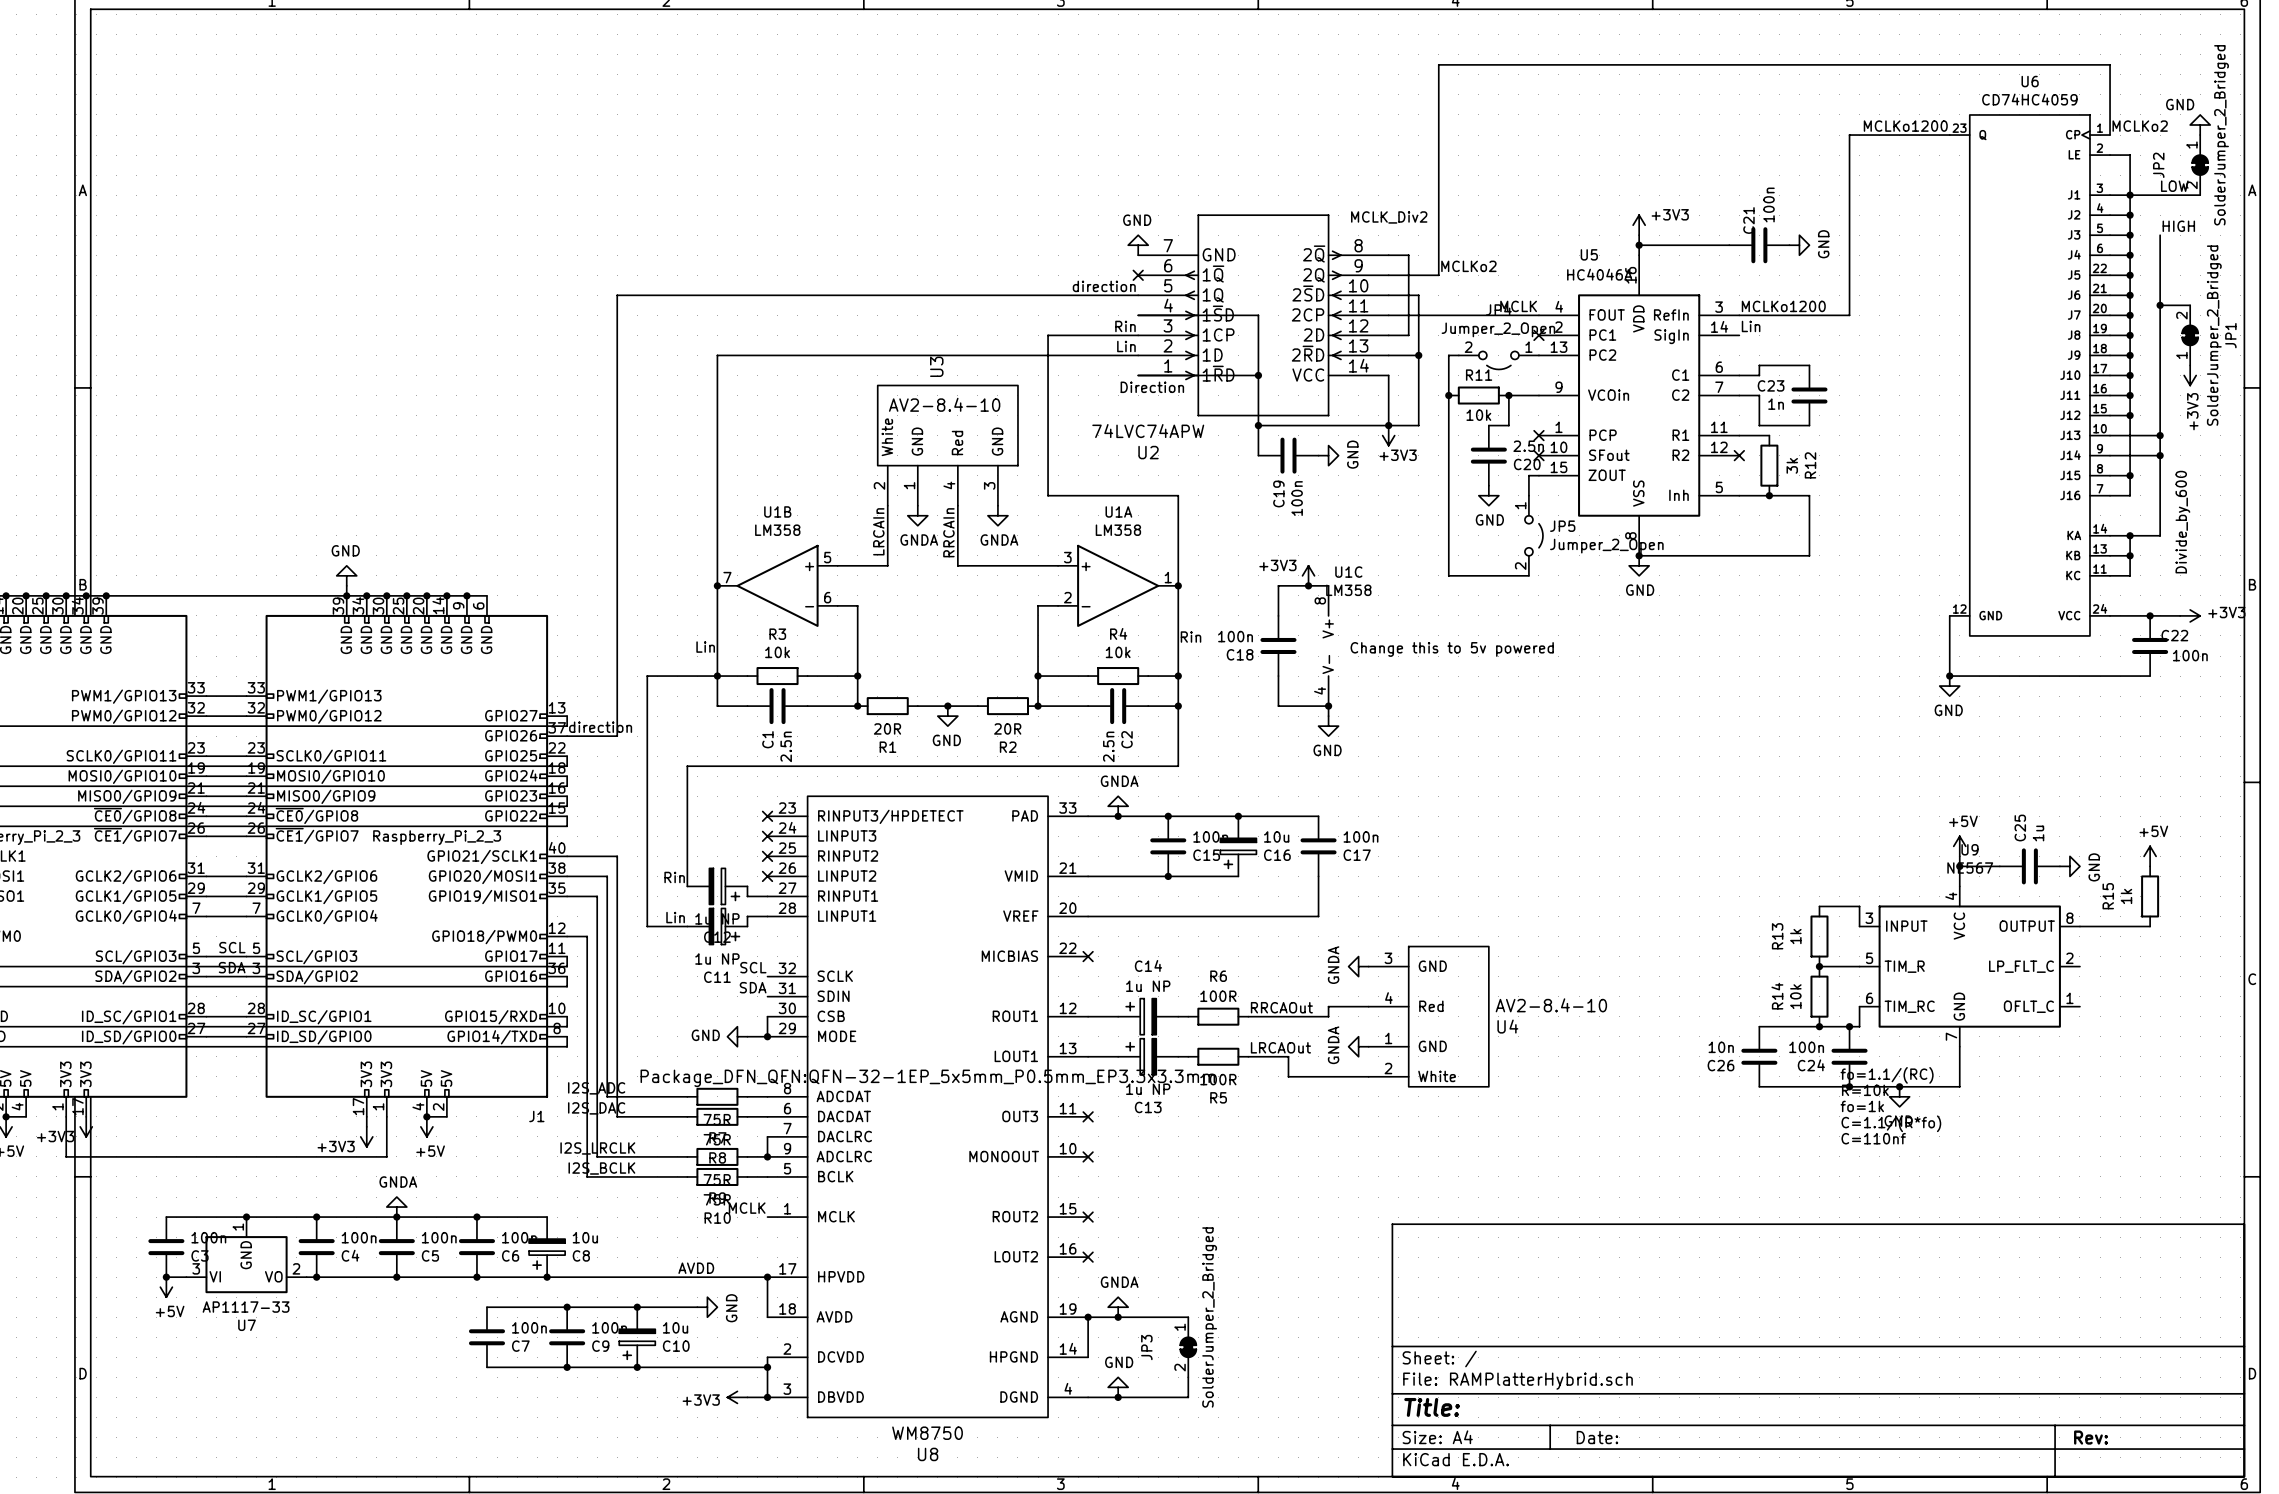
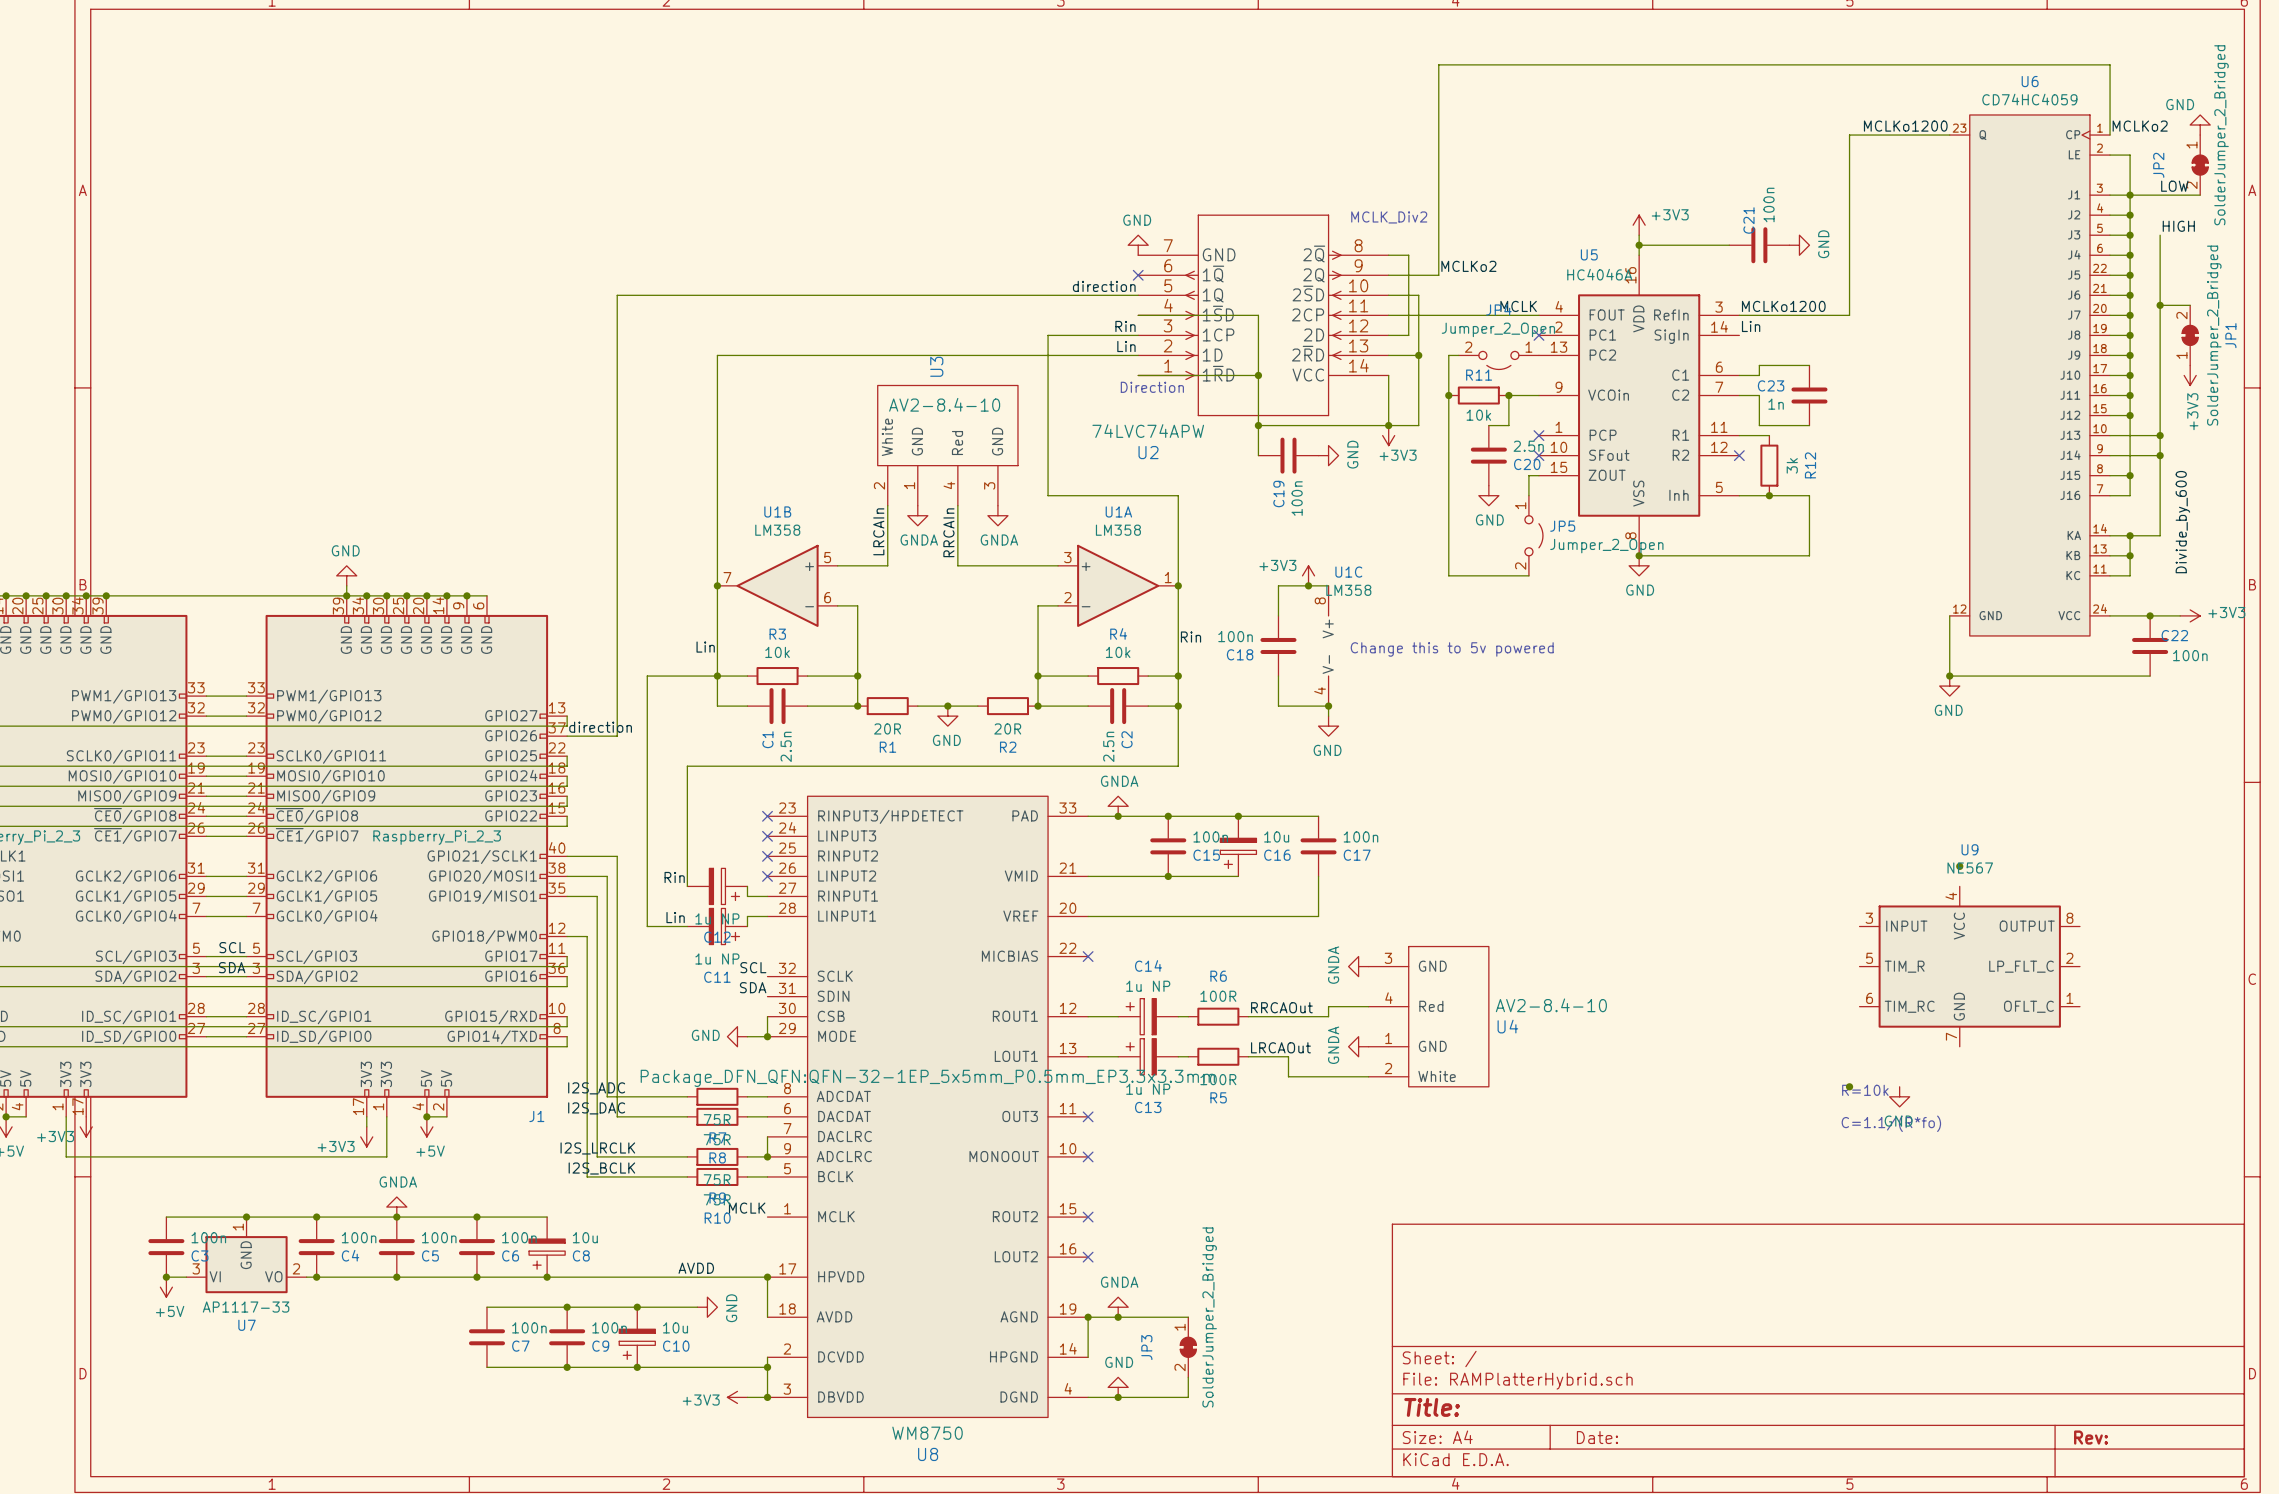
power symbol: +5V (1959, 846) -> none
wire: (1959, 856) (1959, 886) -> none
power symbol: +5V (2150, 856) -> none
wire: (1959, 866) (1999, 866) -> none
C25: 1u (2029, 866) -> none
power symbol: GND (2069, 866) -> none
R15: 1k (2150, 896) -> none
wire: (1819, 906) (1859, 906) (1859, 926) -> none
wire: (2079, 926) (2150, 926) -> none
R13: 1k (1819, 936) -> none
wire: (1819, 966) (1859, 966) -> none
junction: (1819, 966) -> none
R14: 10k (1819, 996) -> none
wire: (1859, 1006) (1859, 1026) (1759, 1026) -> none
junction: (1819, 1026) -> none
junction: (1849, 1026) -> none
wire: (1959, 1046) (1959, 1086) (1759, 1086) -> none
C26: 10n (1759, 1056) -> none
C24: 100n (1849, 1056) -> none
text: fo=1.1/(RC) (1887, 1075) -> none
junction: (1899, 1086) -> none
text: fo=1k (1862, 1106) -> none
text: C=110nf (1873, 1138) -> none

